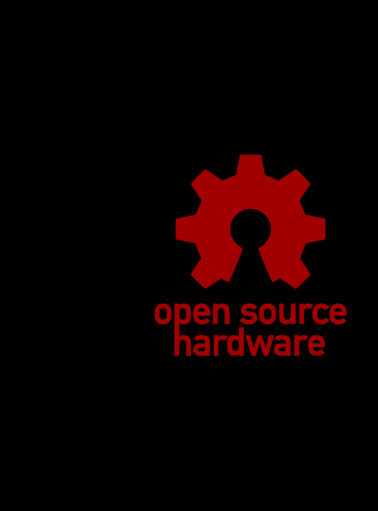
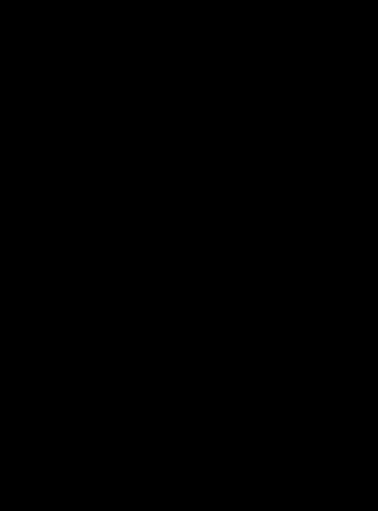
drawing: [154, 154, 347, 356] -> none

